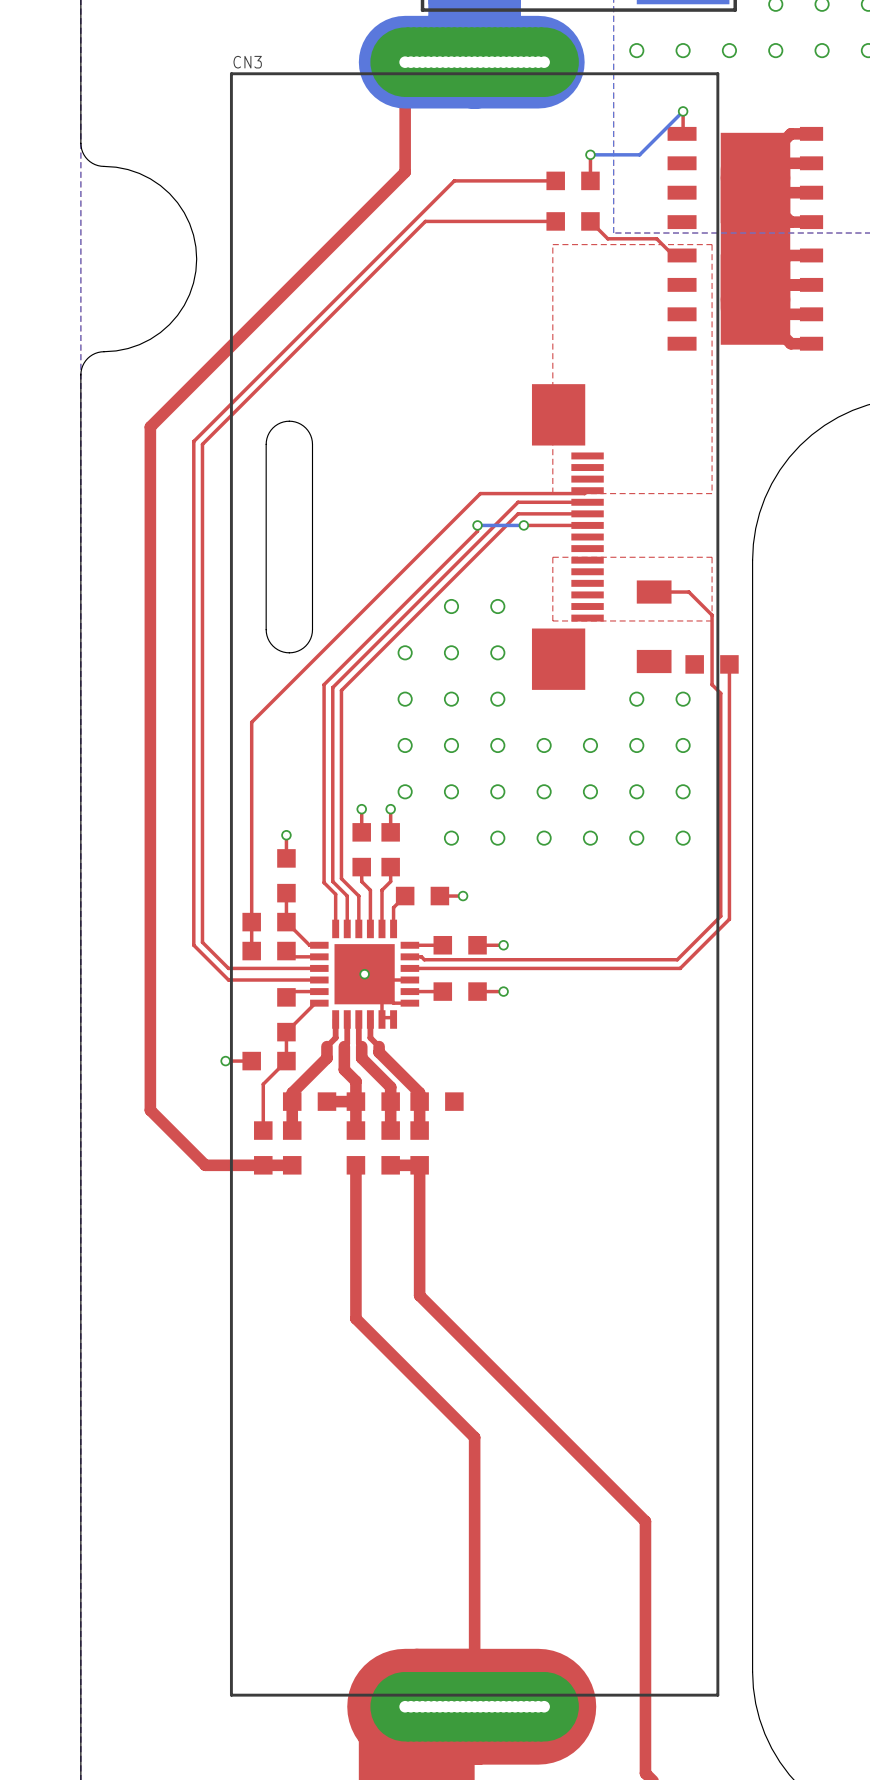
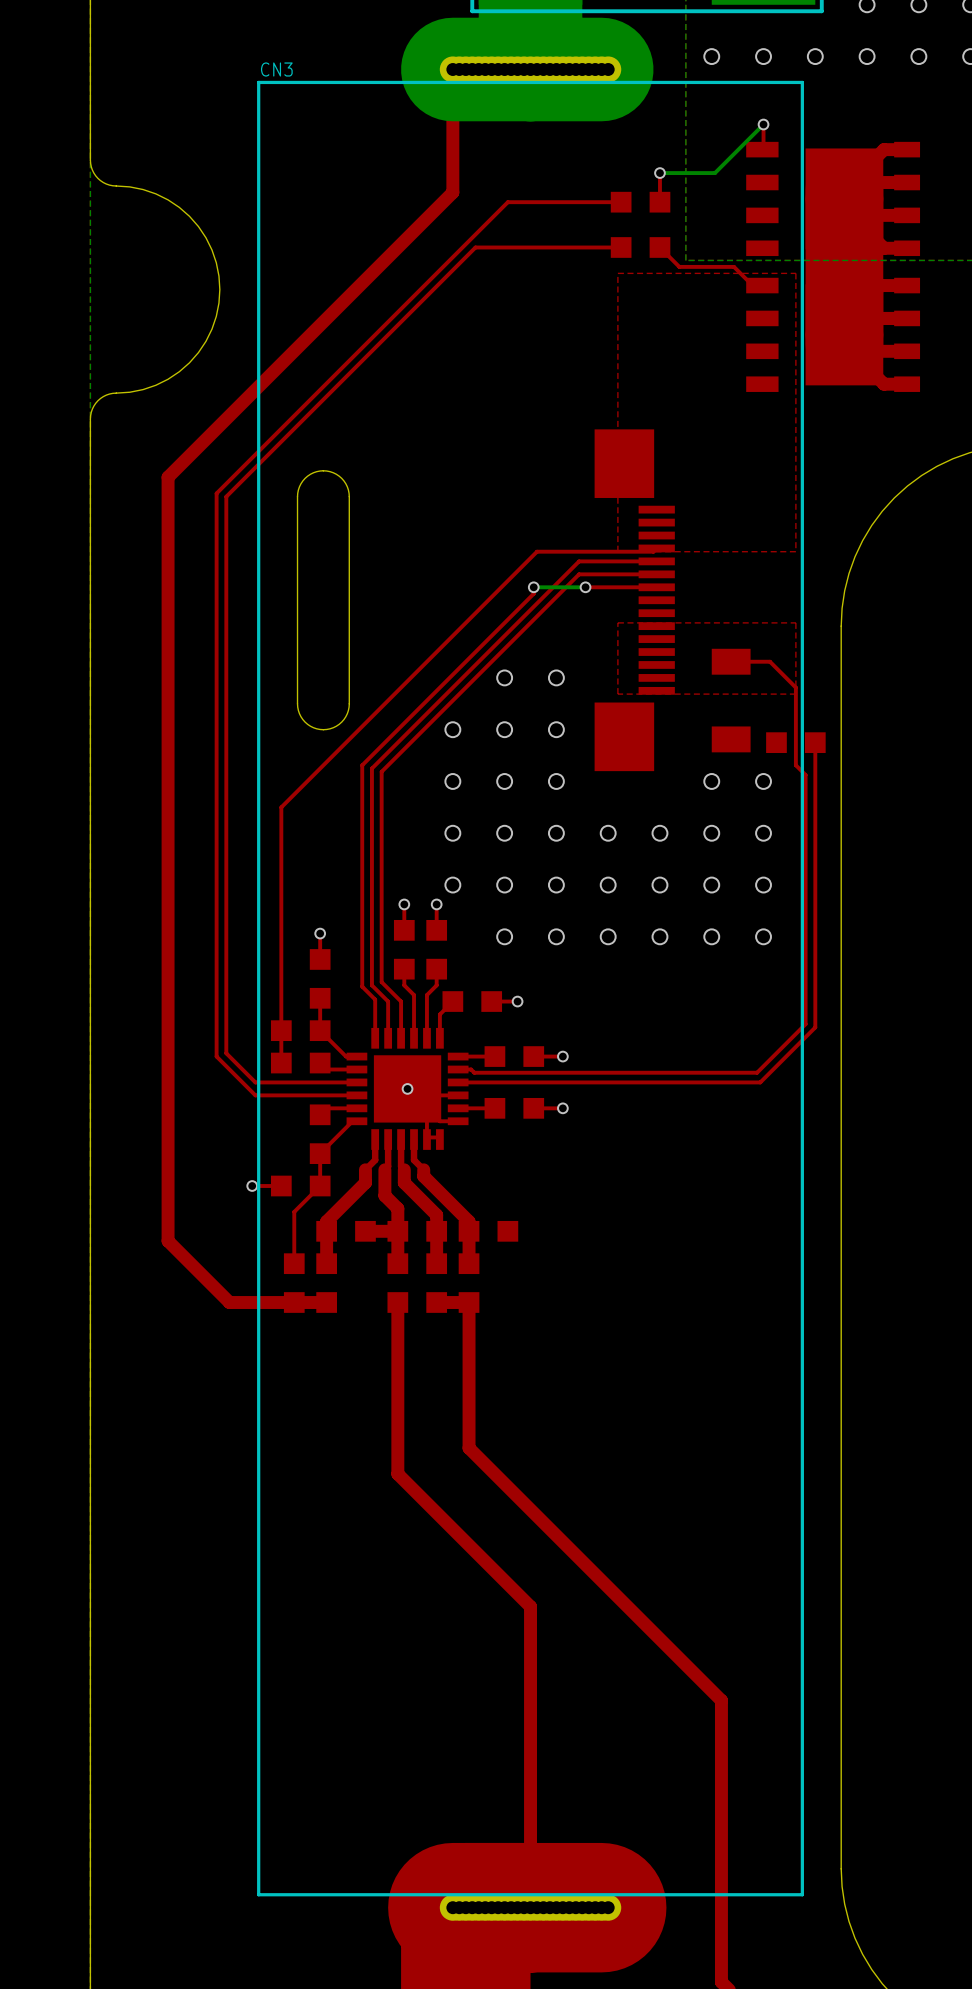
CN3 footprint: [229, 27, 720, 1742] -> [257, 56, 804, 1921]

